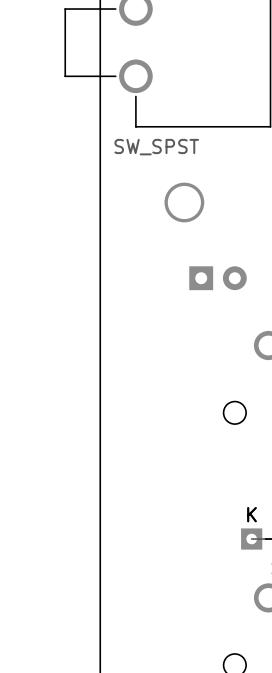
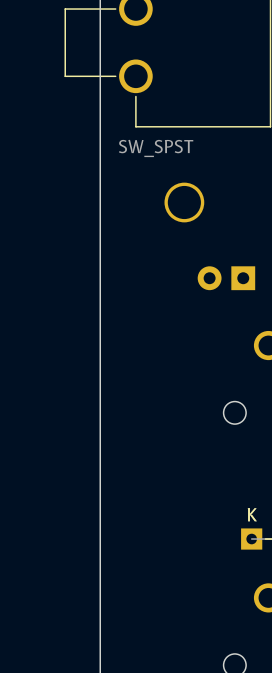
part rotation: 0° (218, 278) -> 180° (226, 278)

